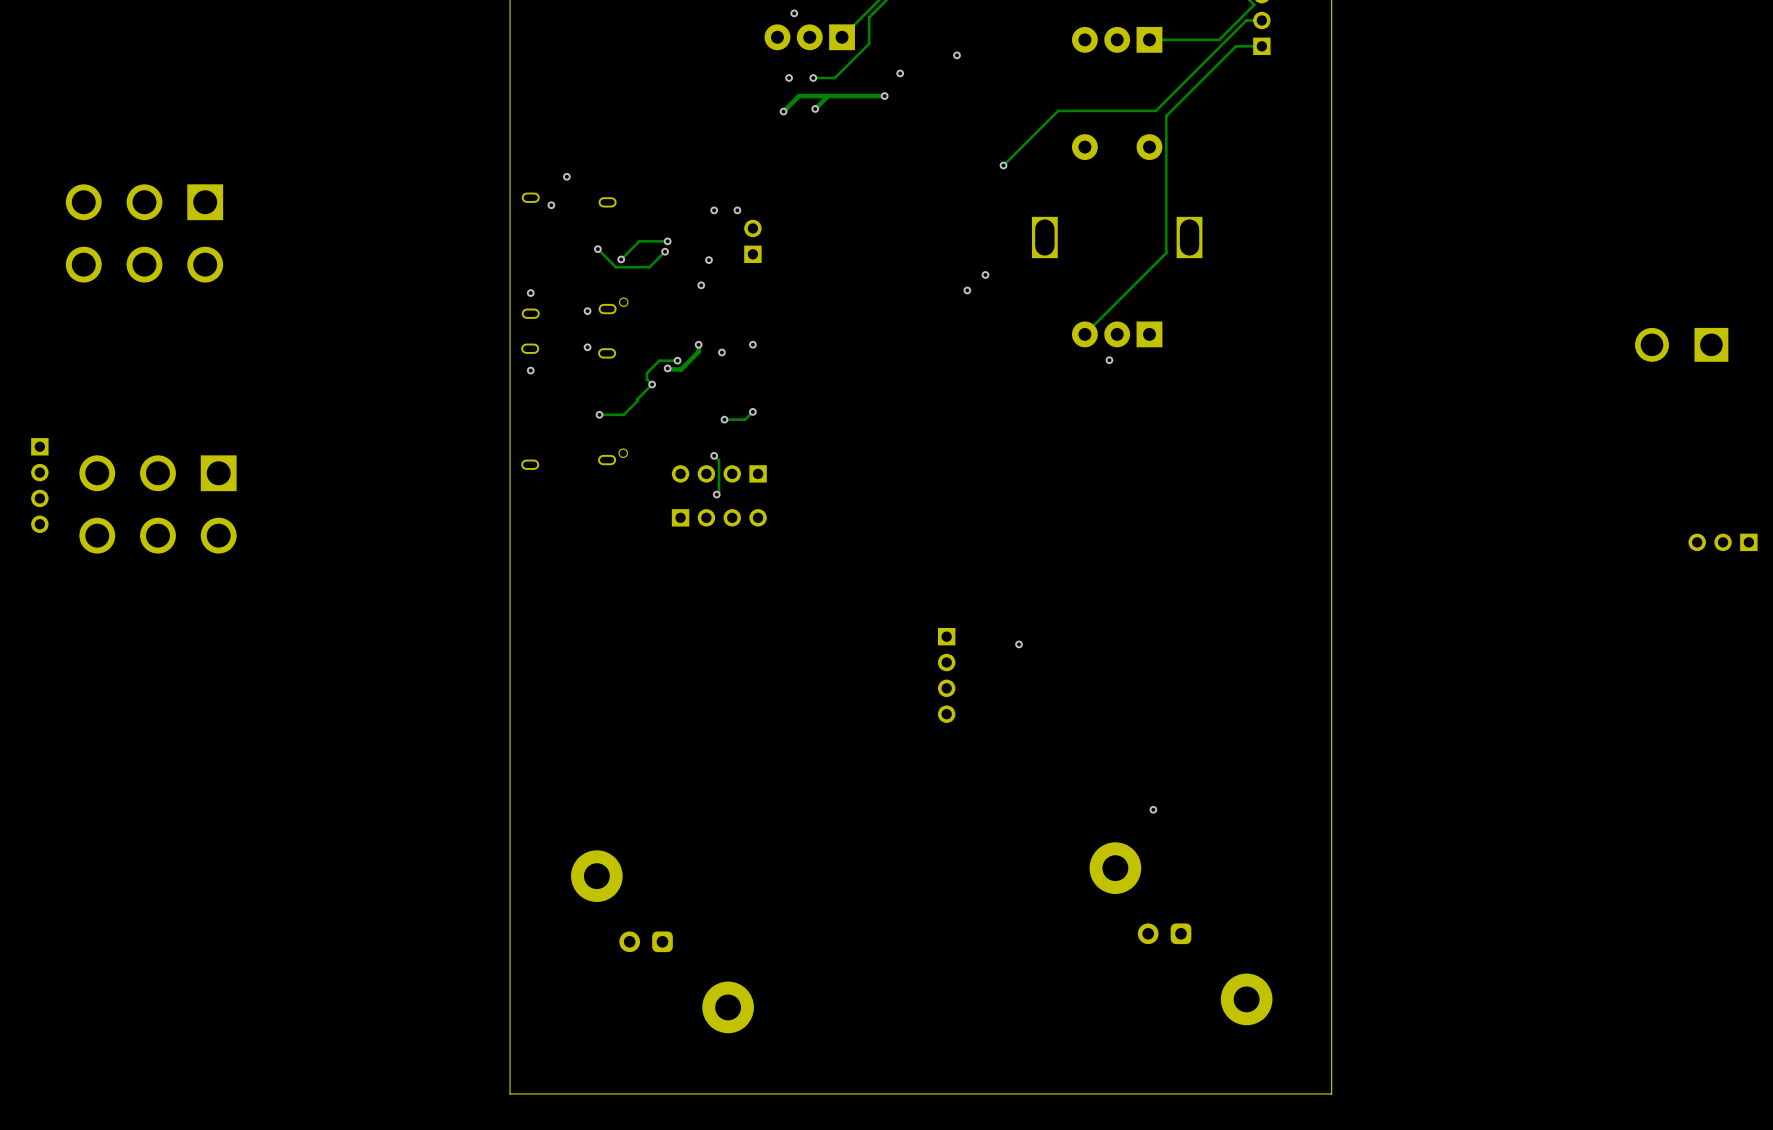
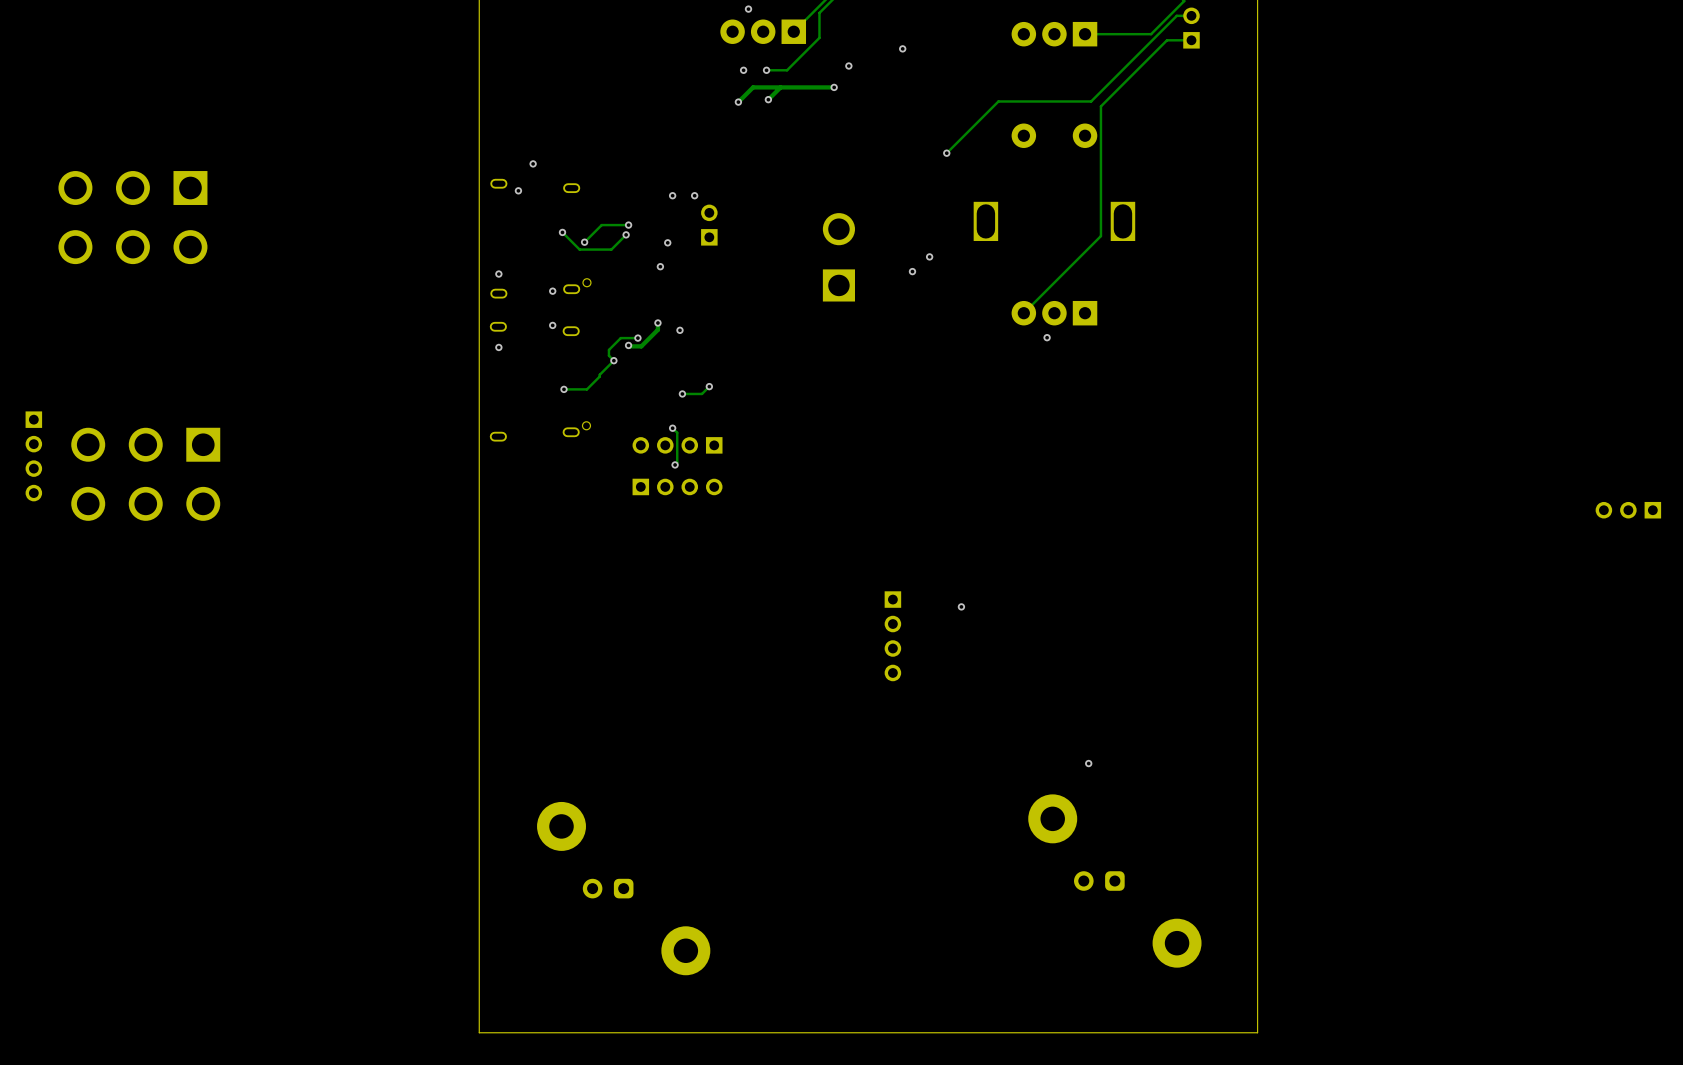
part: none -> (838, 257)
via: (752, 344) -> none
part: (1681, 344) -> none

